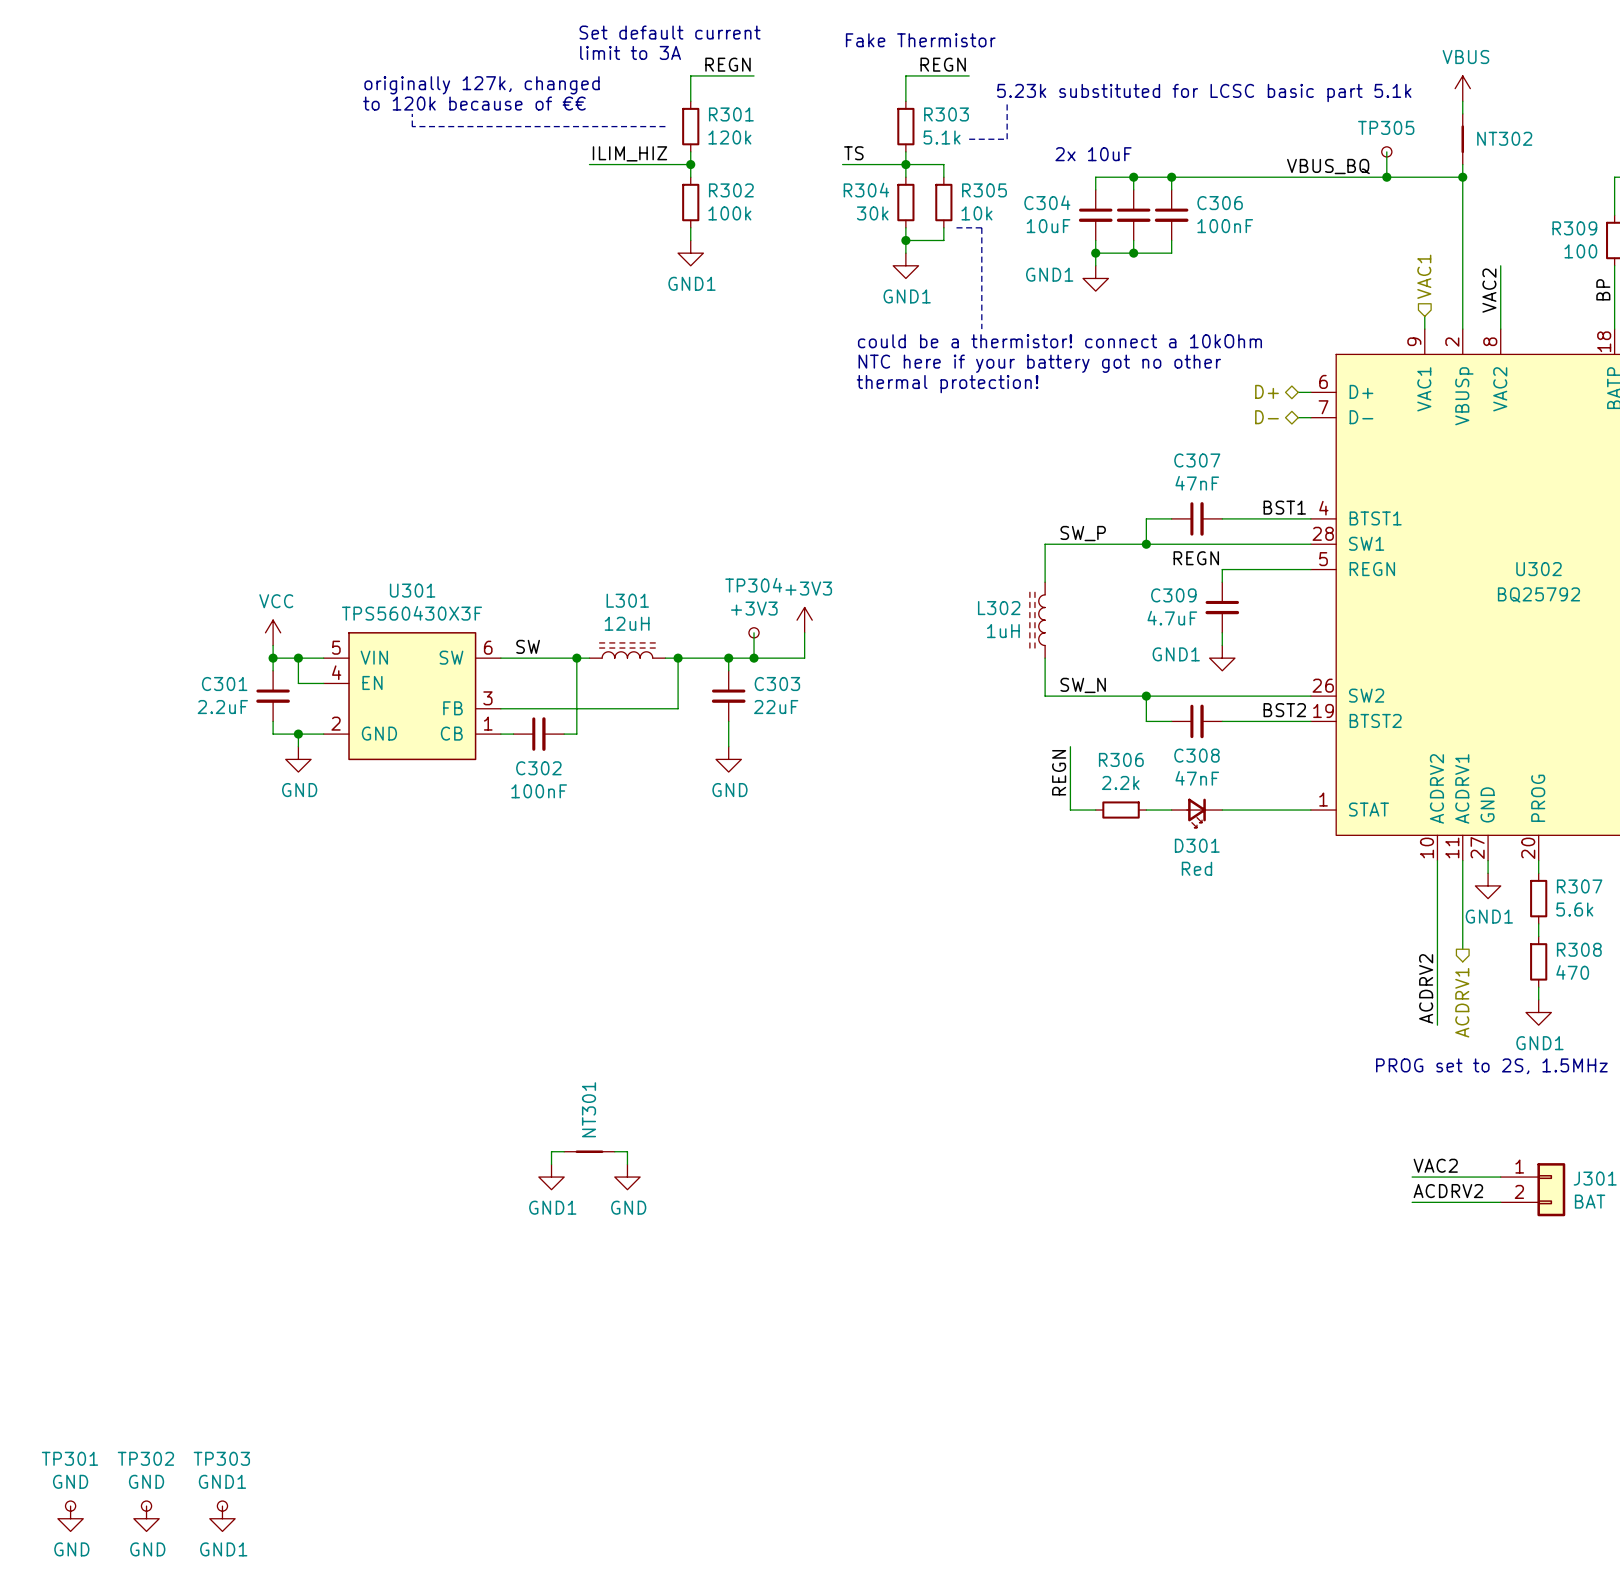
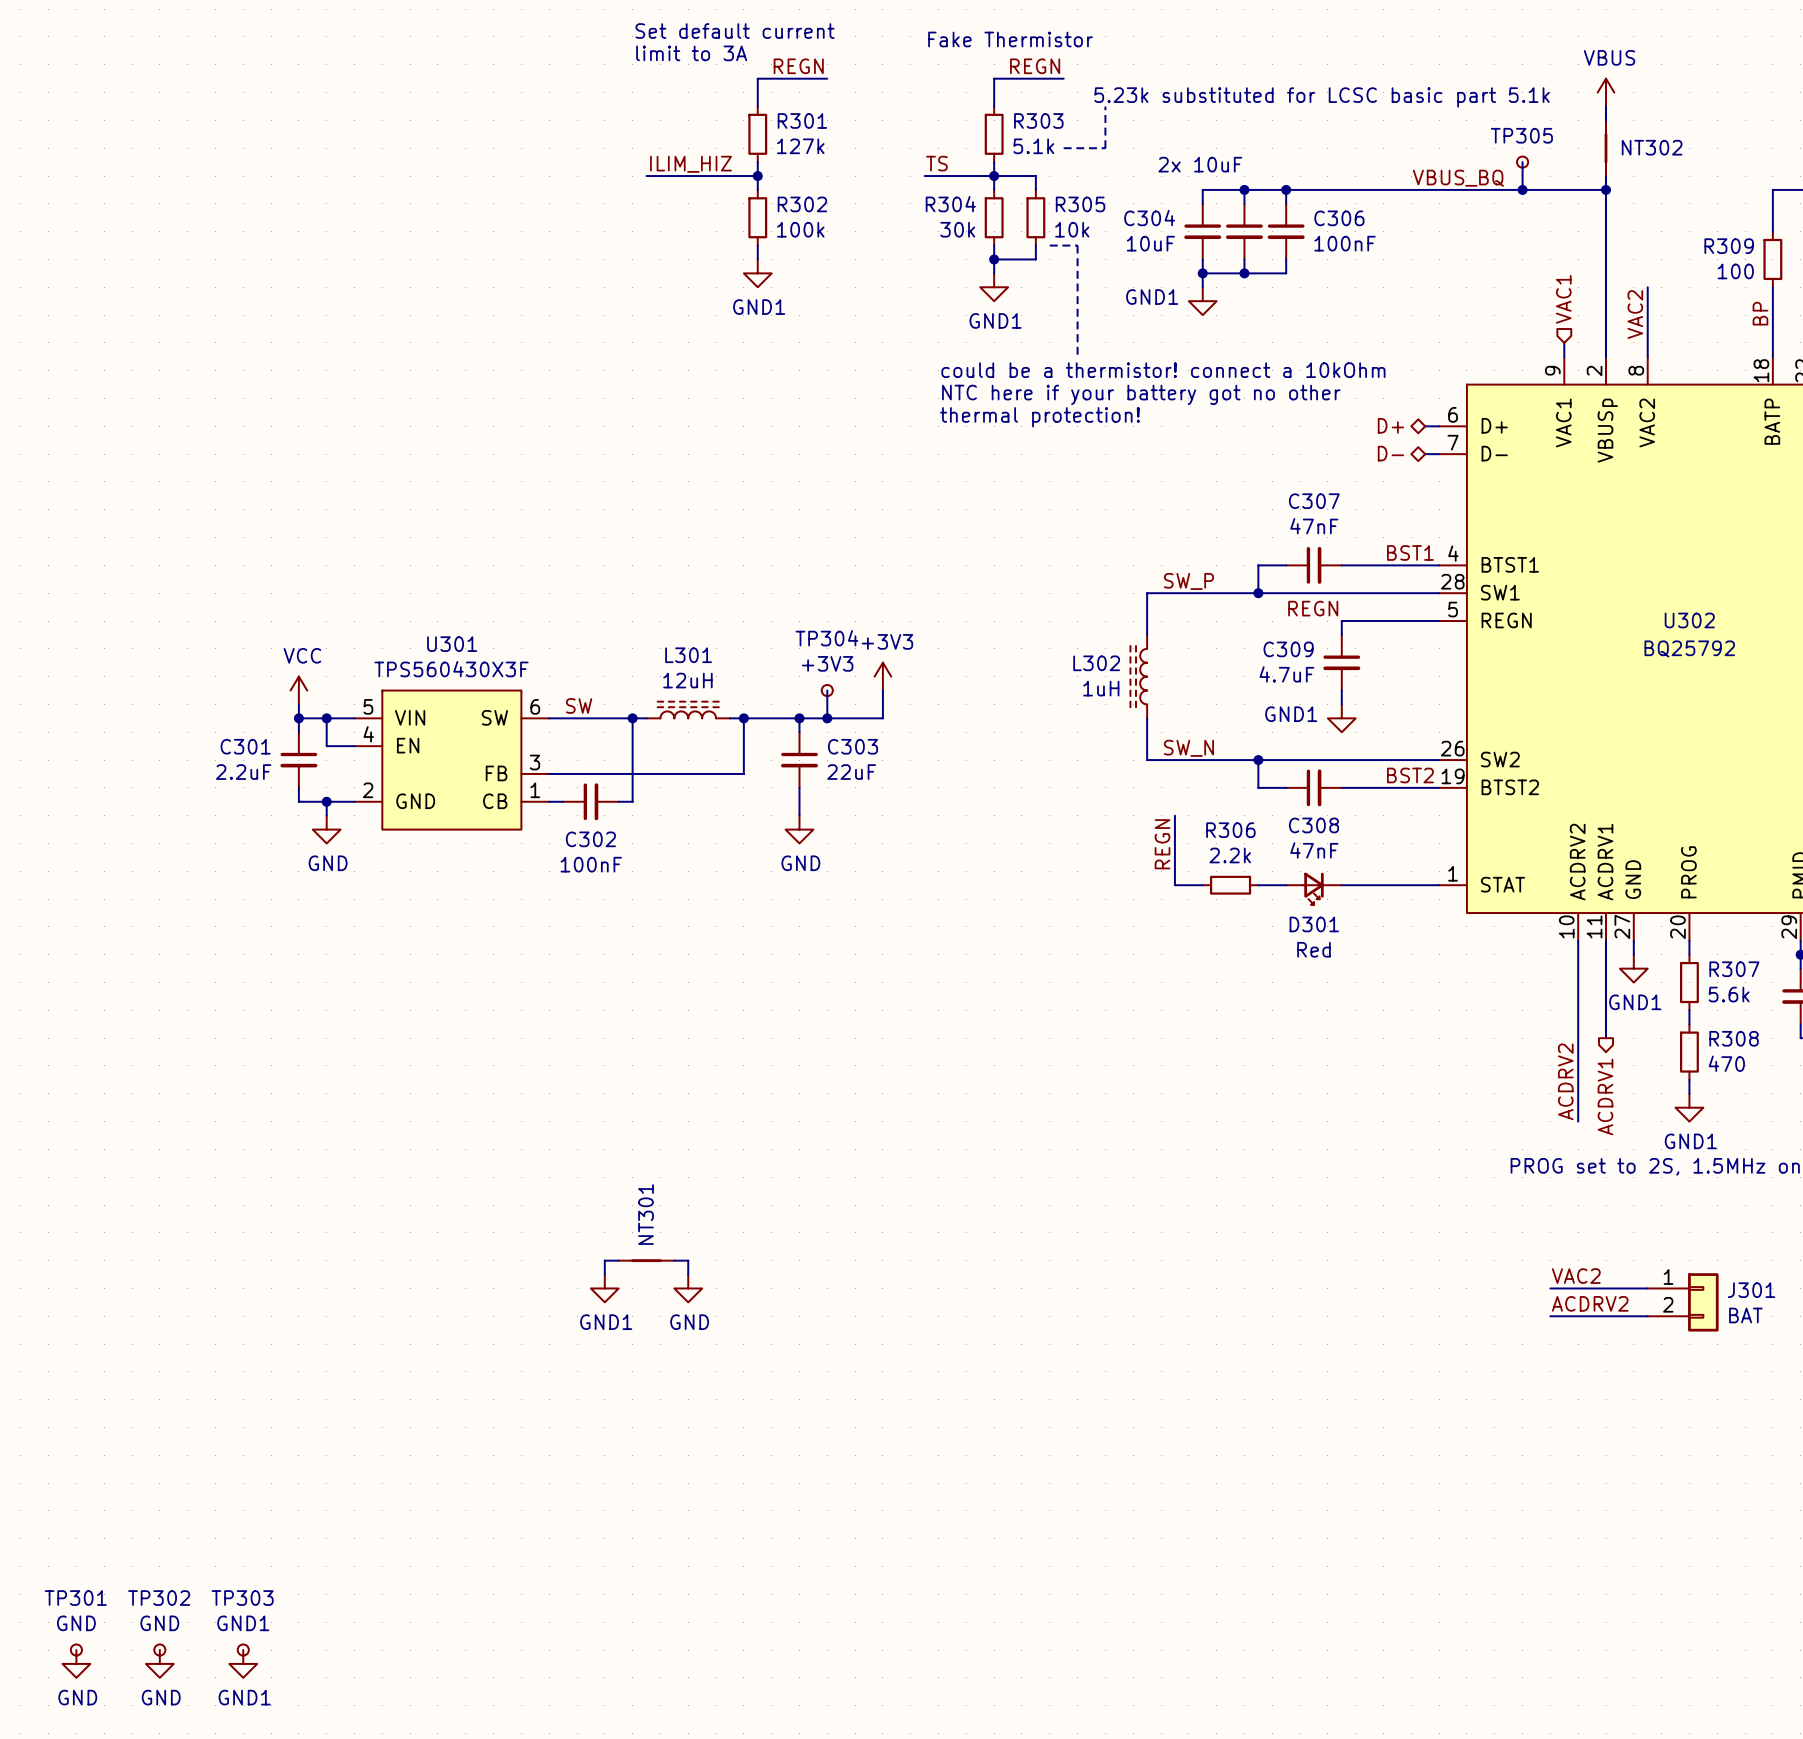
text: originally 127k, changed (482, 85) -> none
text: to 120k because of €€ (474, 103) -> none
line: (412, 113) (412, 126) (665, 126) -> none
R301 value: 120k (729, 137) -> 127k (800, 146)

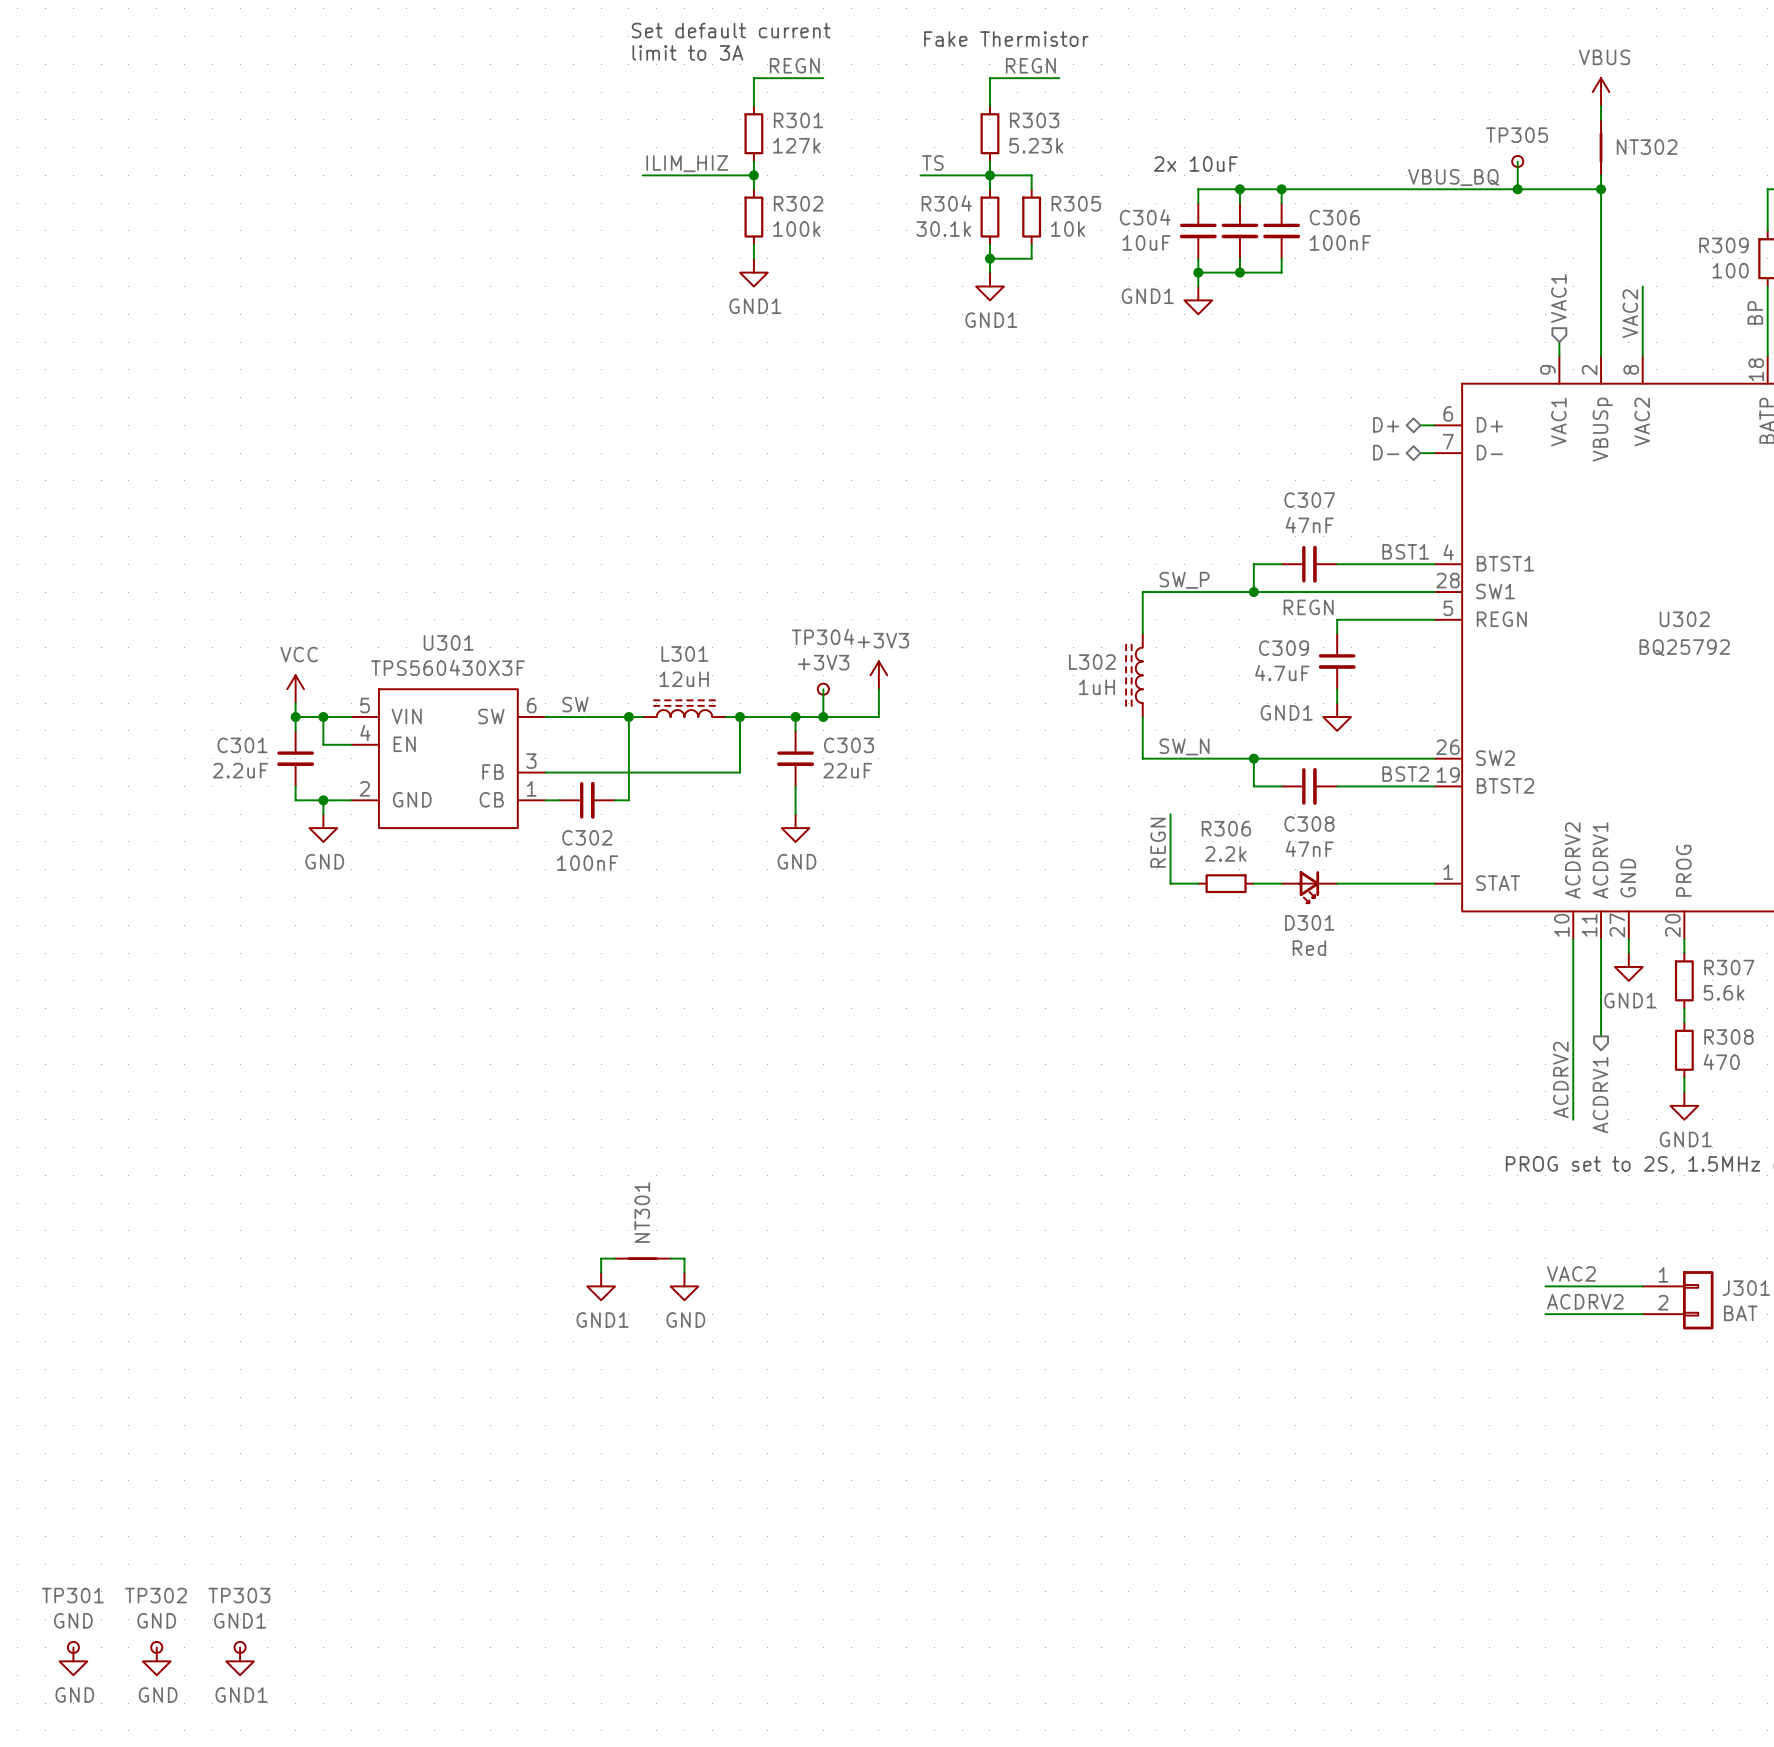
text: 5.23k substituted for LCSC basic part 5.1k (1322, 97) -> none
line: (1105, 106) (1105, 148) (1063, 148) -> none
R303 value: 5.1k (1033, 146) -> 5.23k (1036, 145)
R304 value: 30k (957, 229) -> 30.1k (943, 229)
line: (1049, 245) (1077, 245) (1077, 356) -> none
text: could be a thermistor! connect a 10kOhm (1163, 370) -> none
text: NTC here if your battery got no other (1141, 394) -> none
text: thermal protection! (1039, 417) -> none

